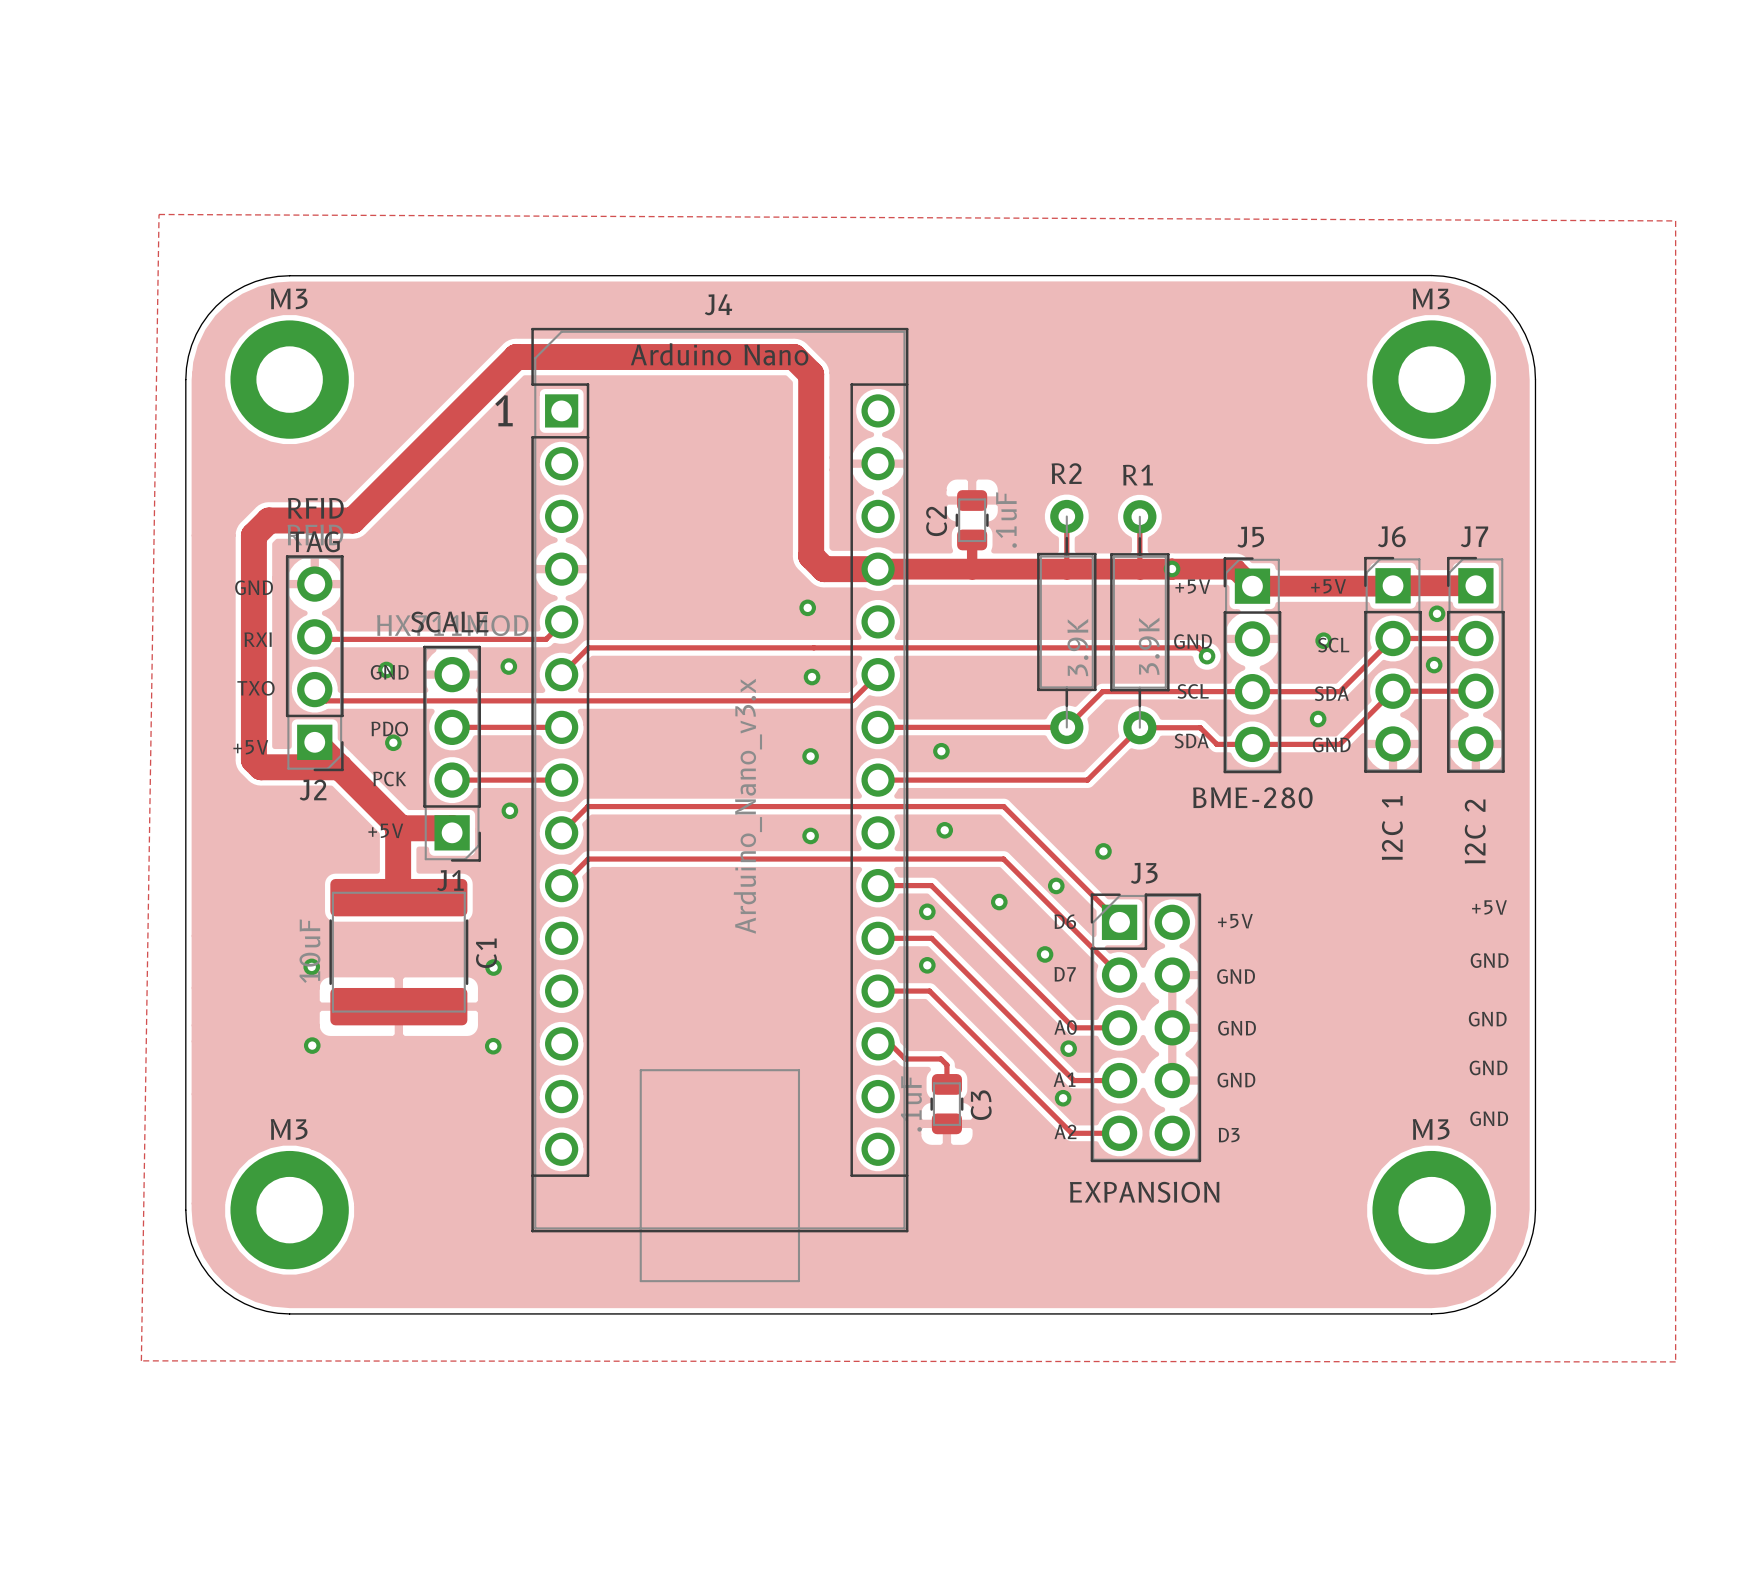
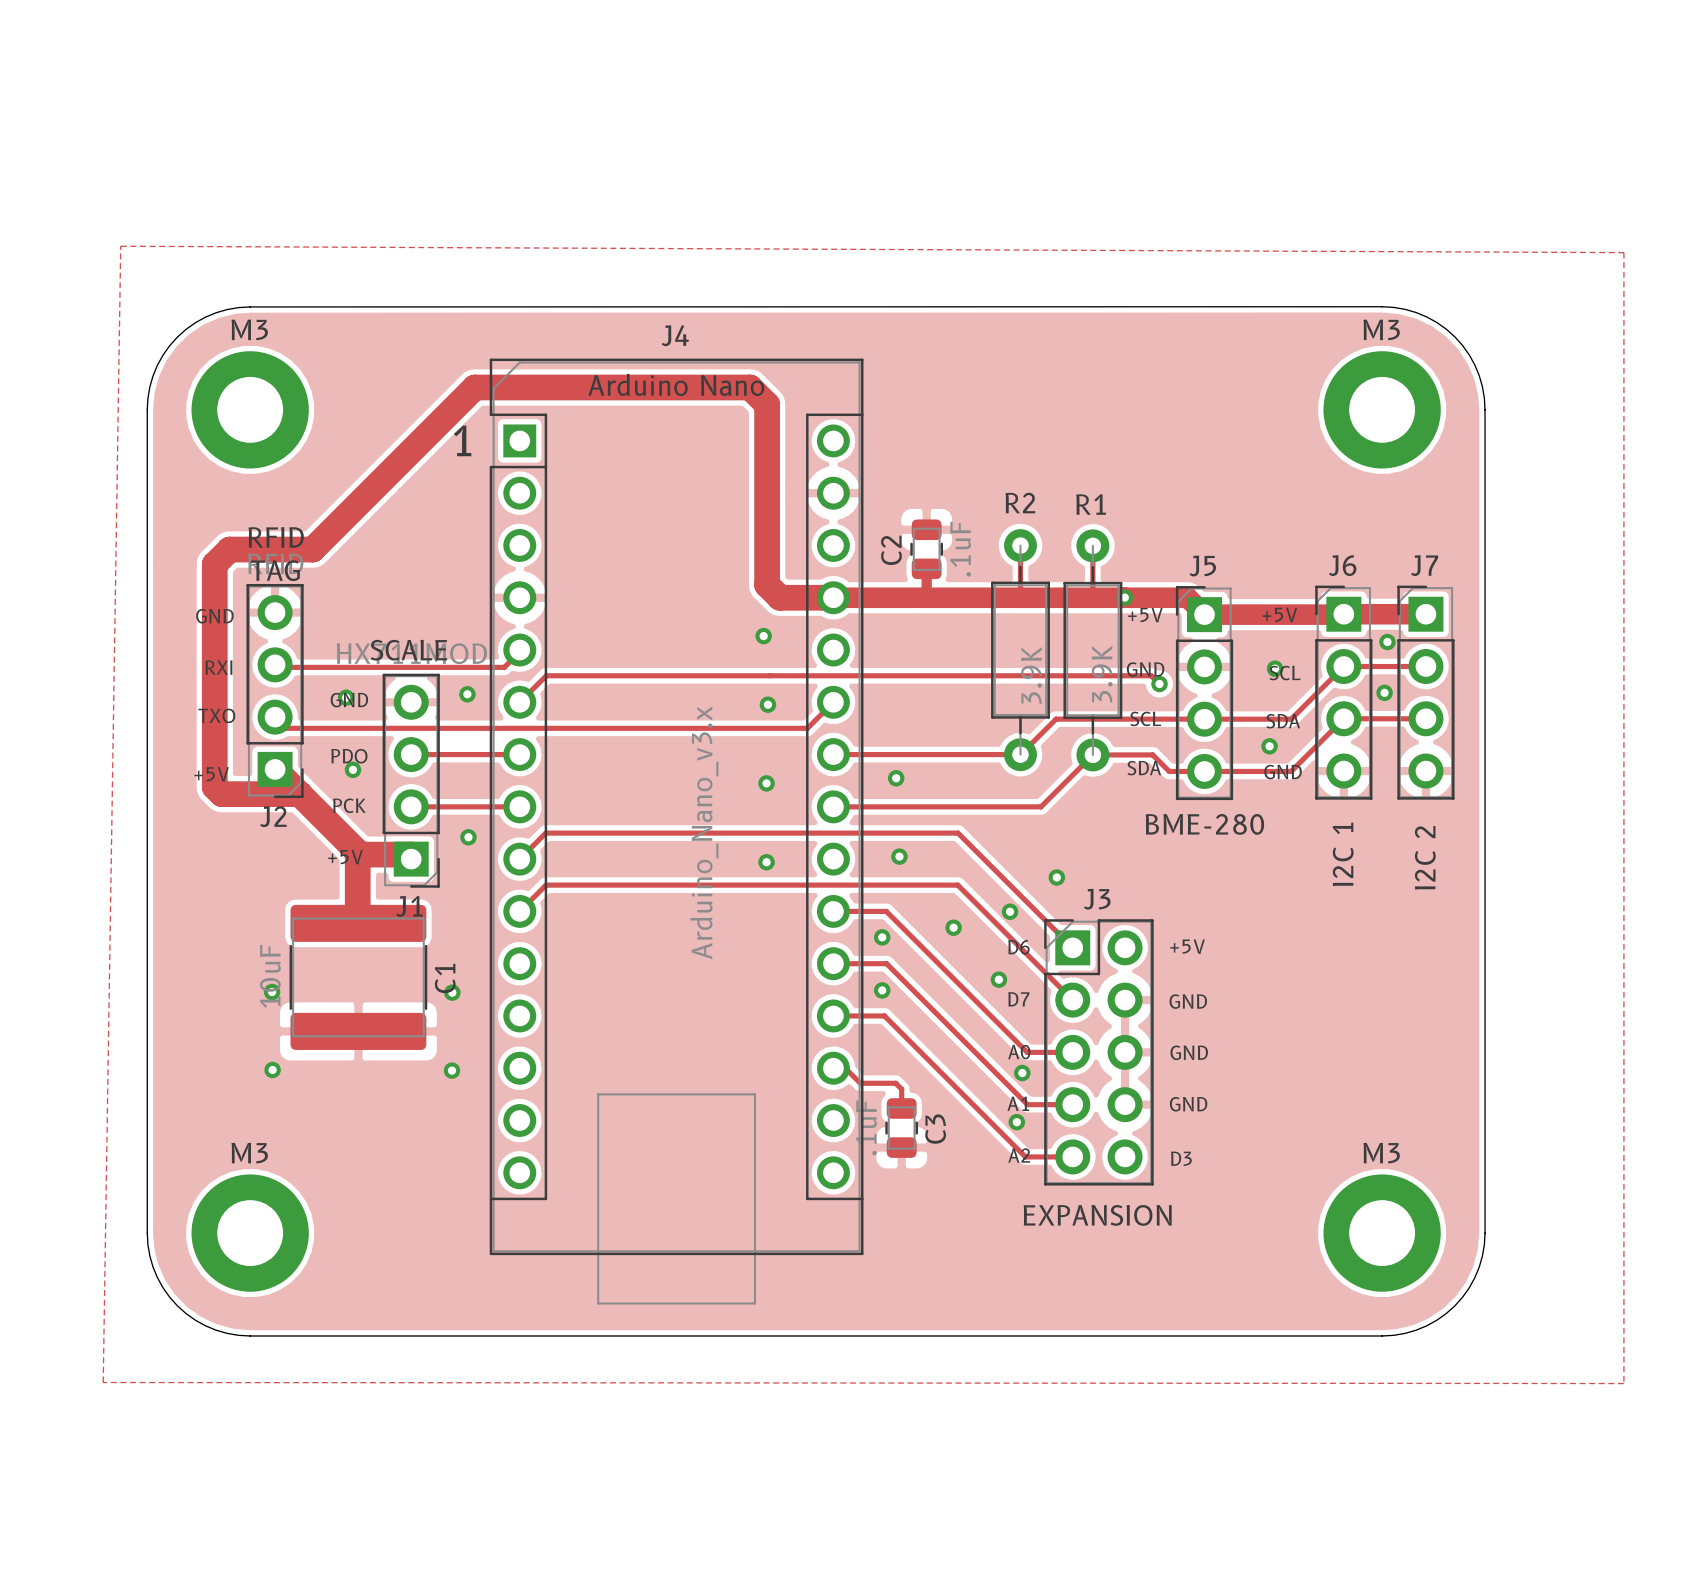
text: +5V (1489, 907) -> none
text: GND (1489, 960) -> none
text: GND (1487, 1019) -> none
text: GND (1488, 1067) -> none
text: GND (1489, 1118) -> none

